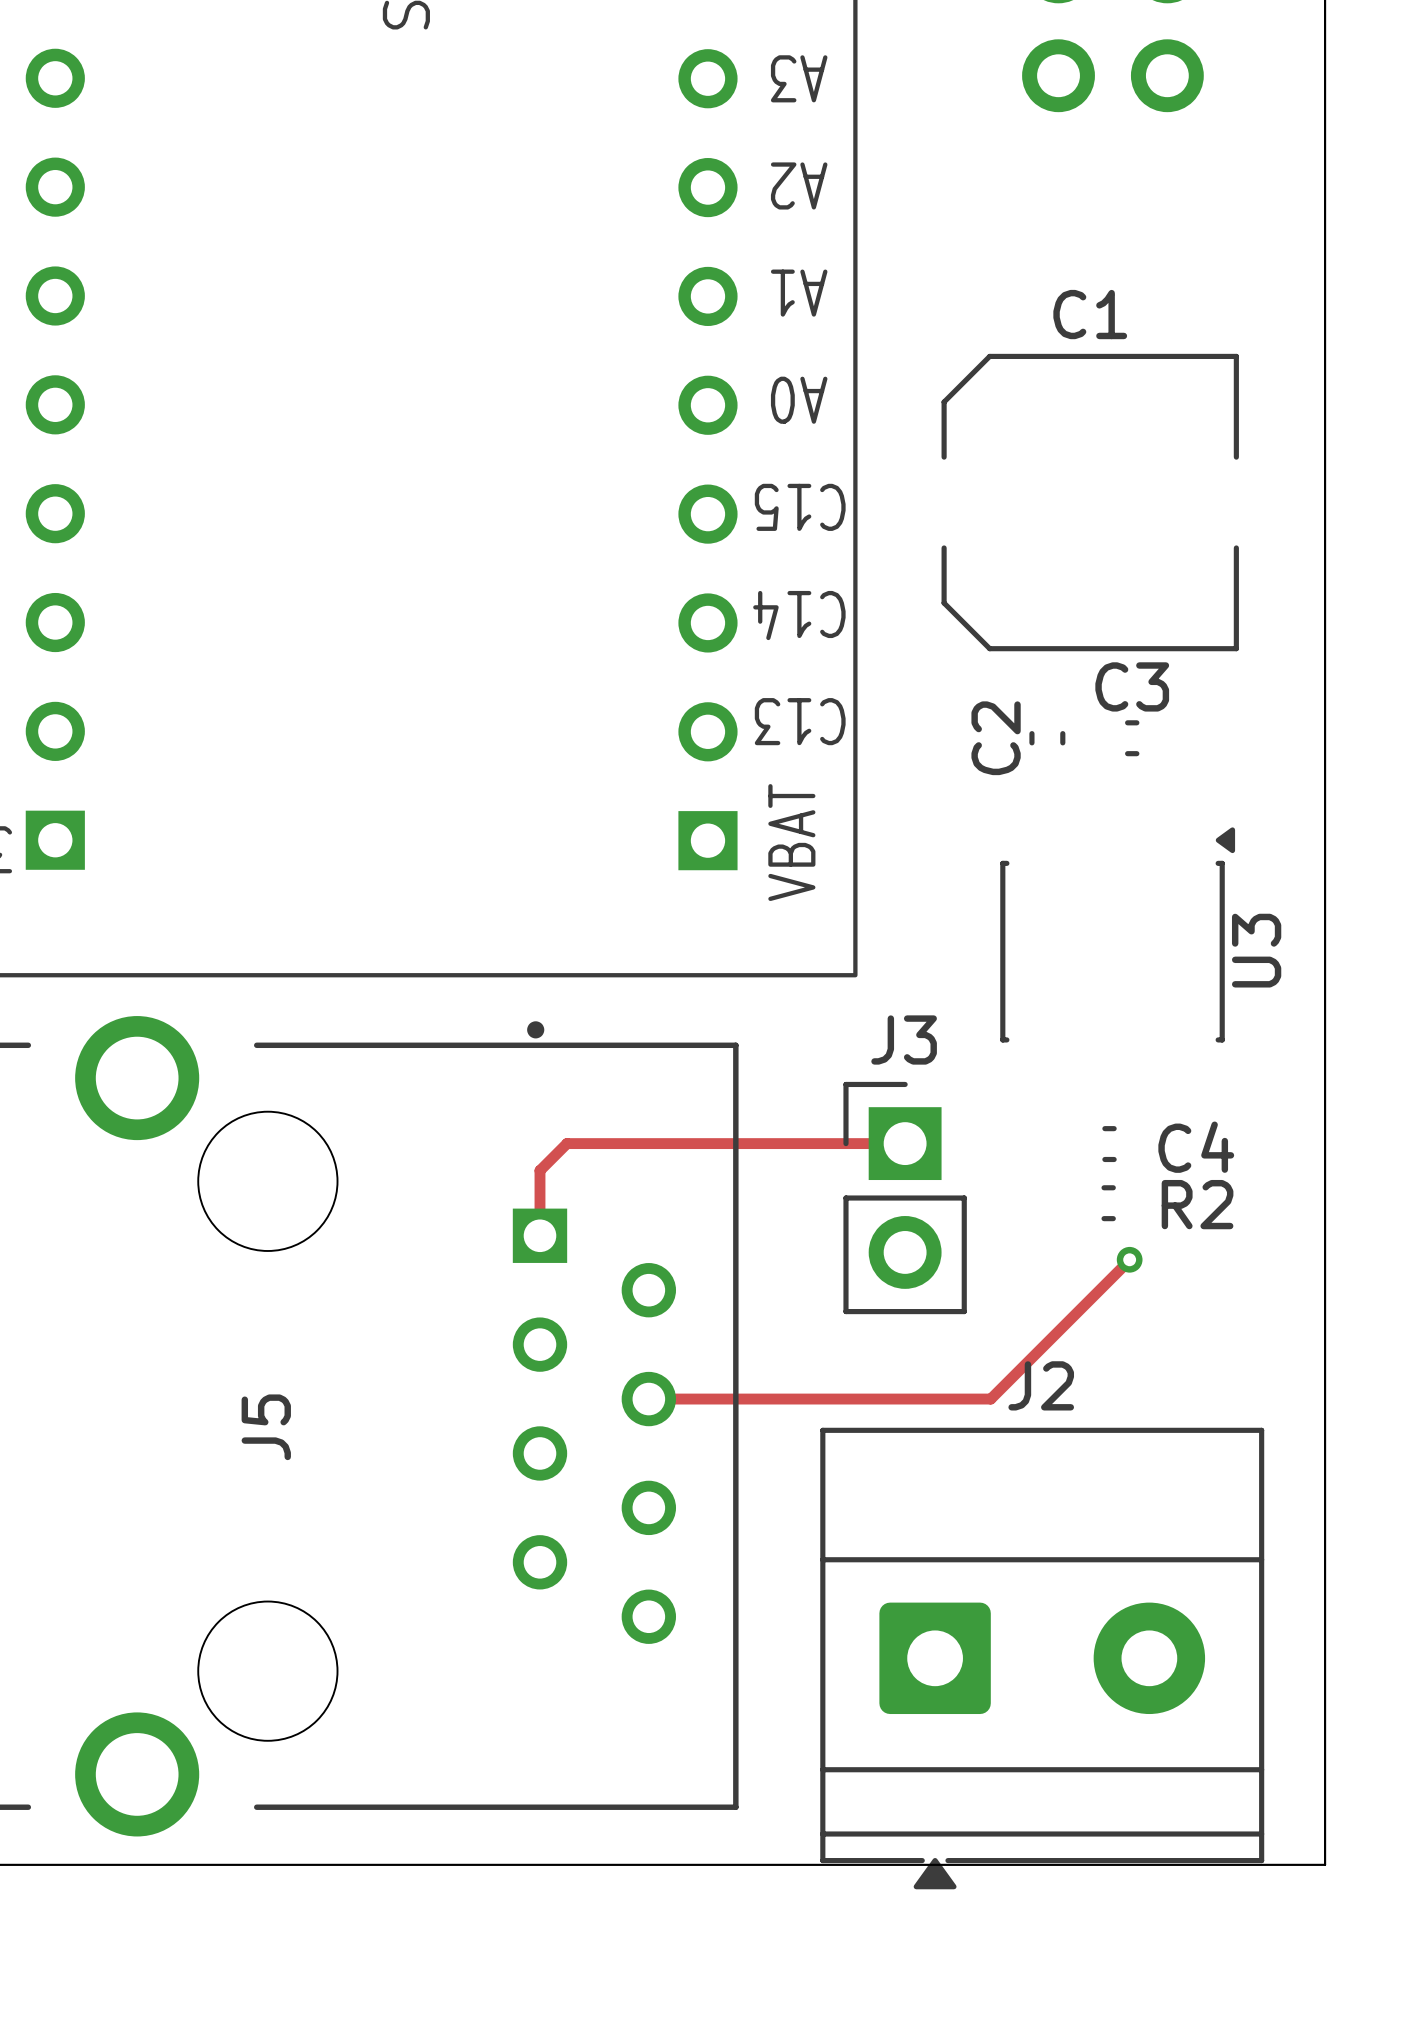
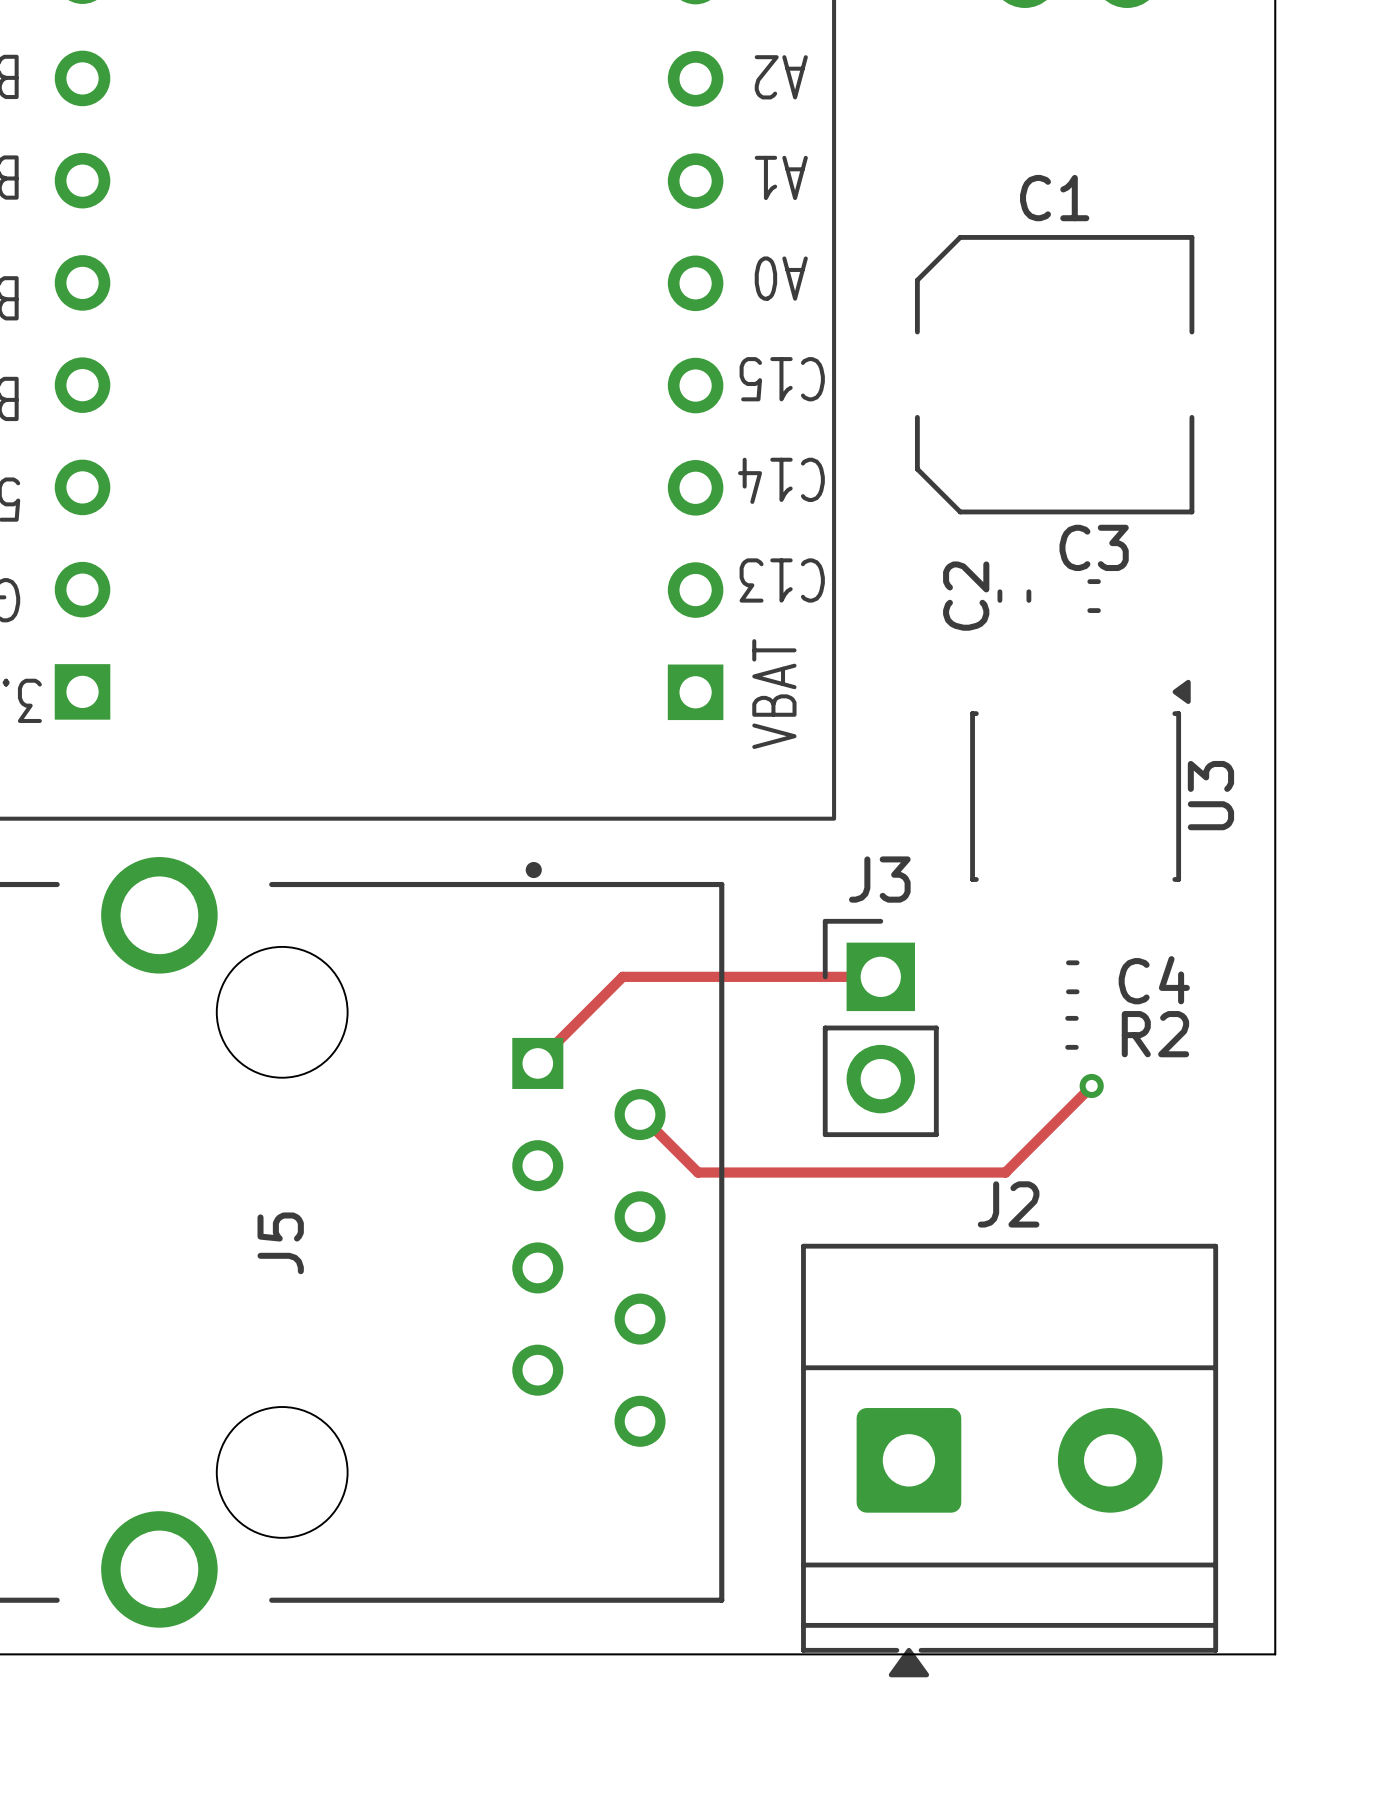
track: (630, 1143) (567, 1143) (539, 1170) (539, 1234) -> (622, 976) (537, 1061)
track: (1037, 1351) (990, 1399) (648, 1399) -> (1005, 1172) (698, 1172) (640, 1114)

